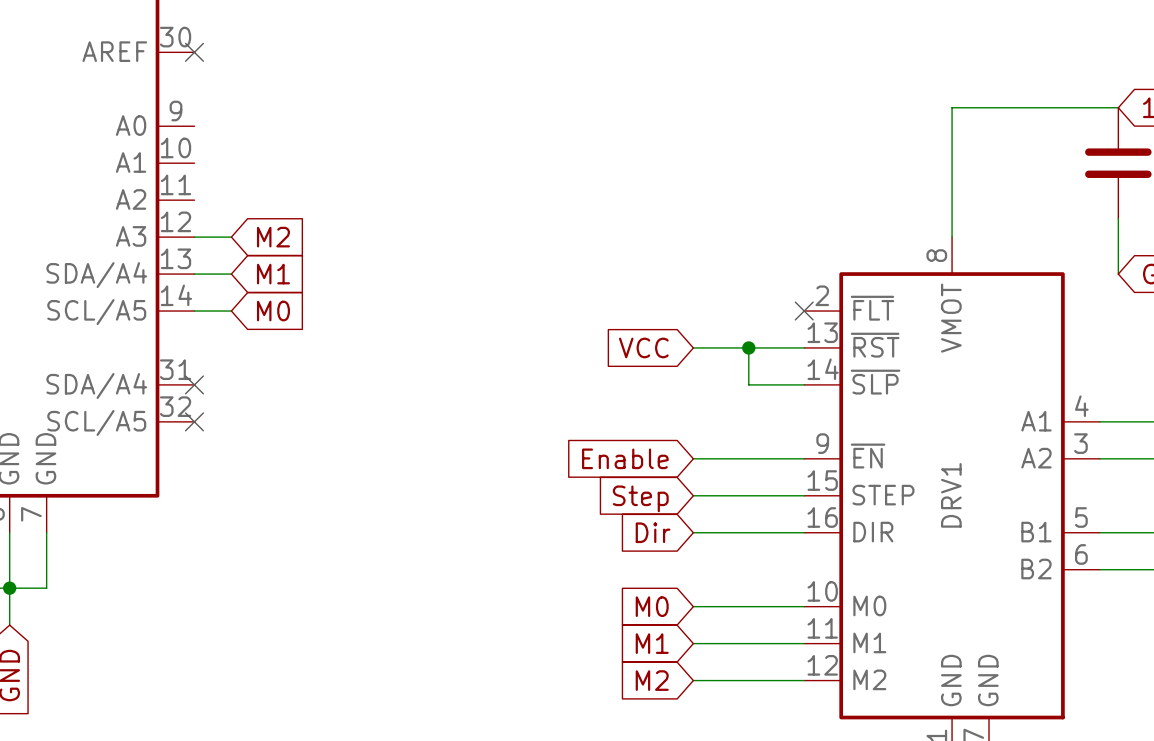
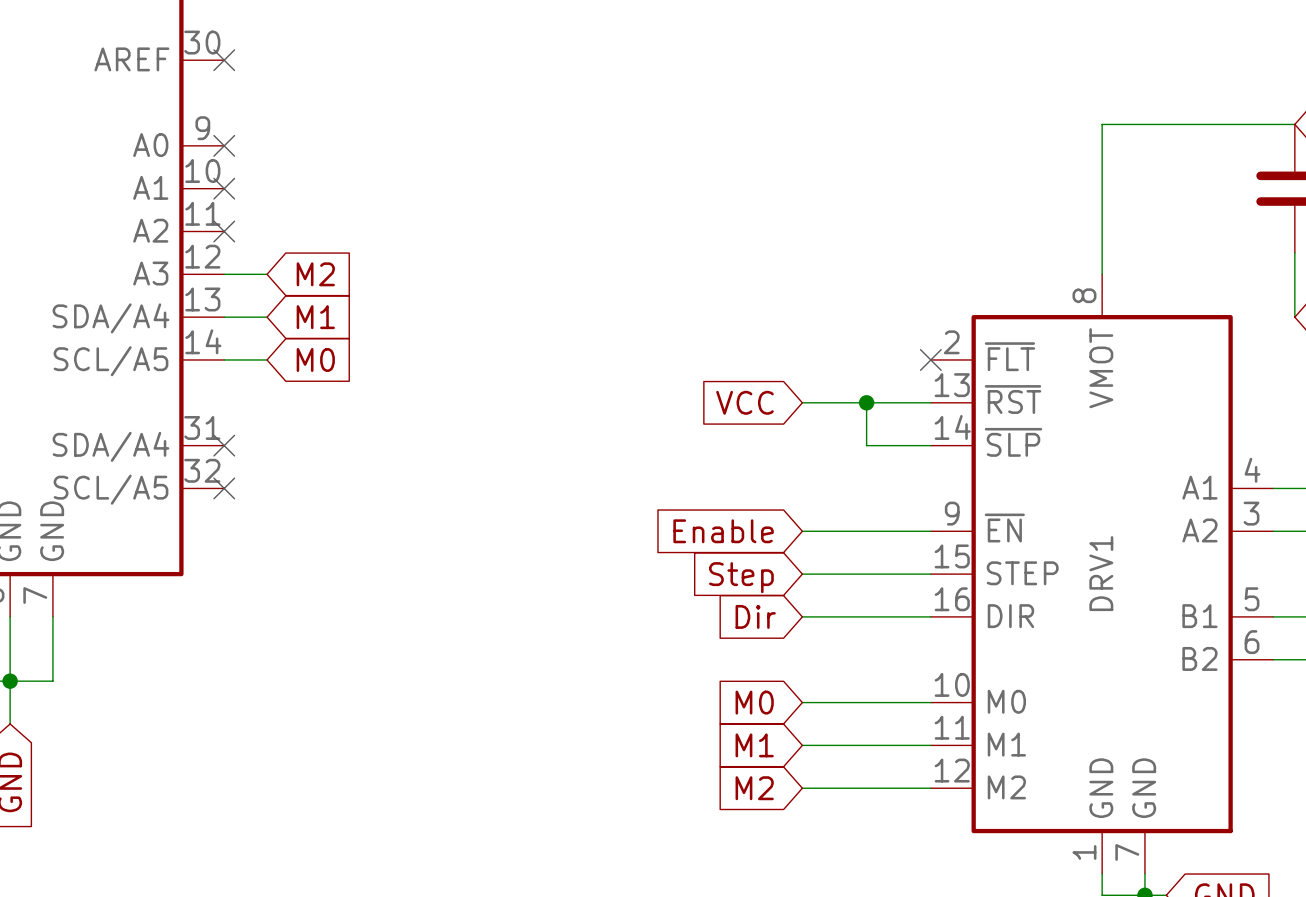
no-connect mark: none -> (224, 145)
no-connect mark: none -> (224, 188)
no-connect mark: none -> (224, 231)

